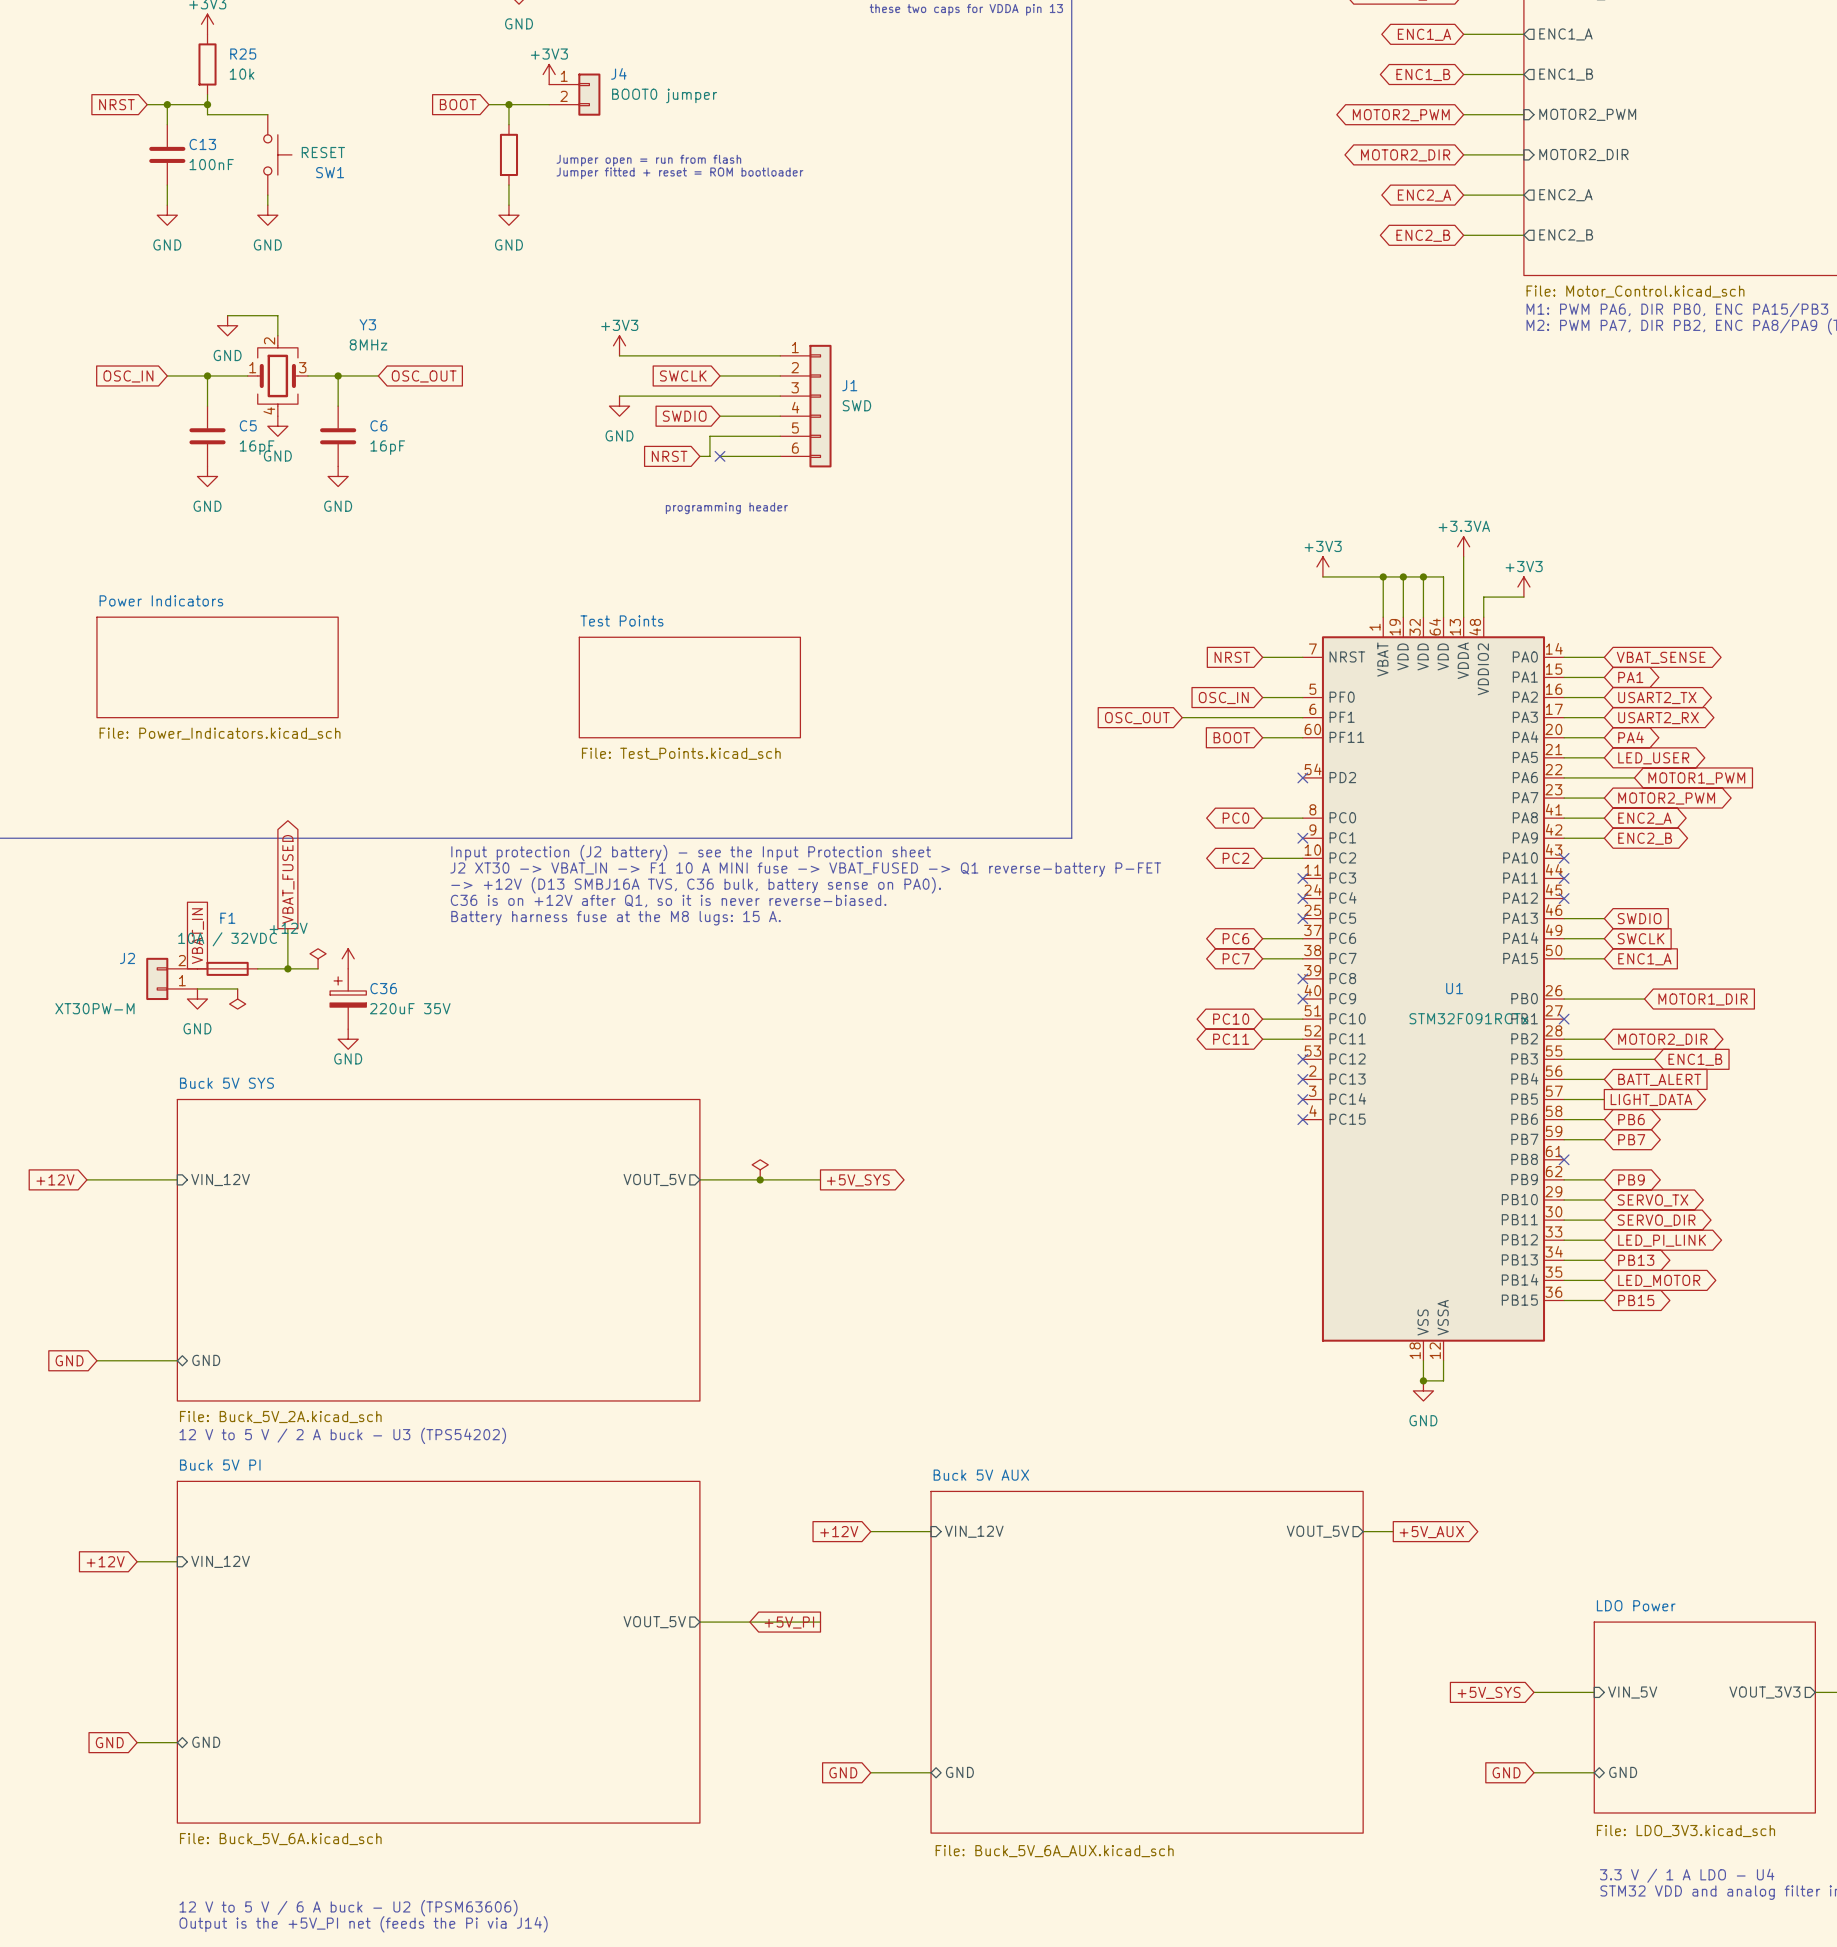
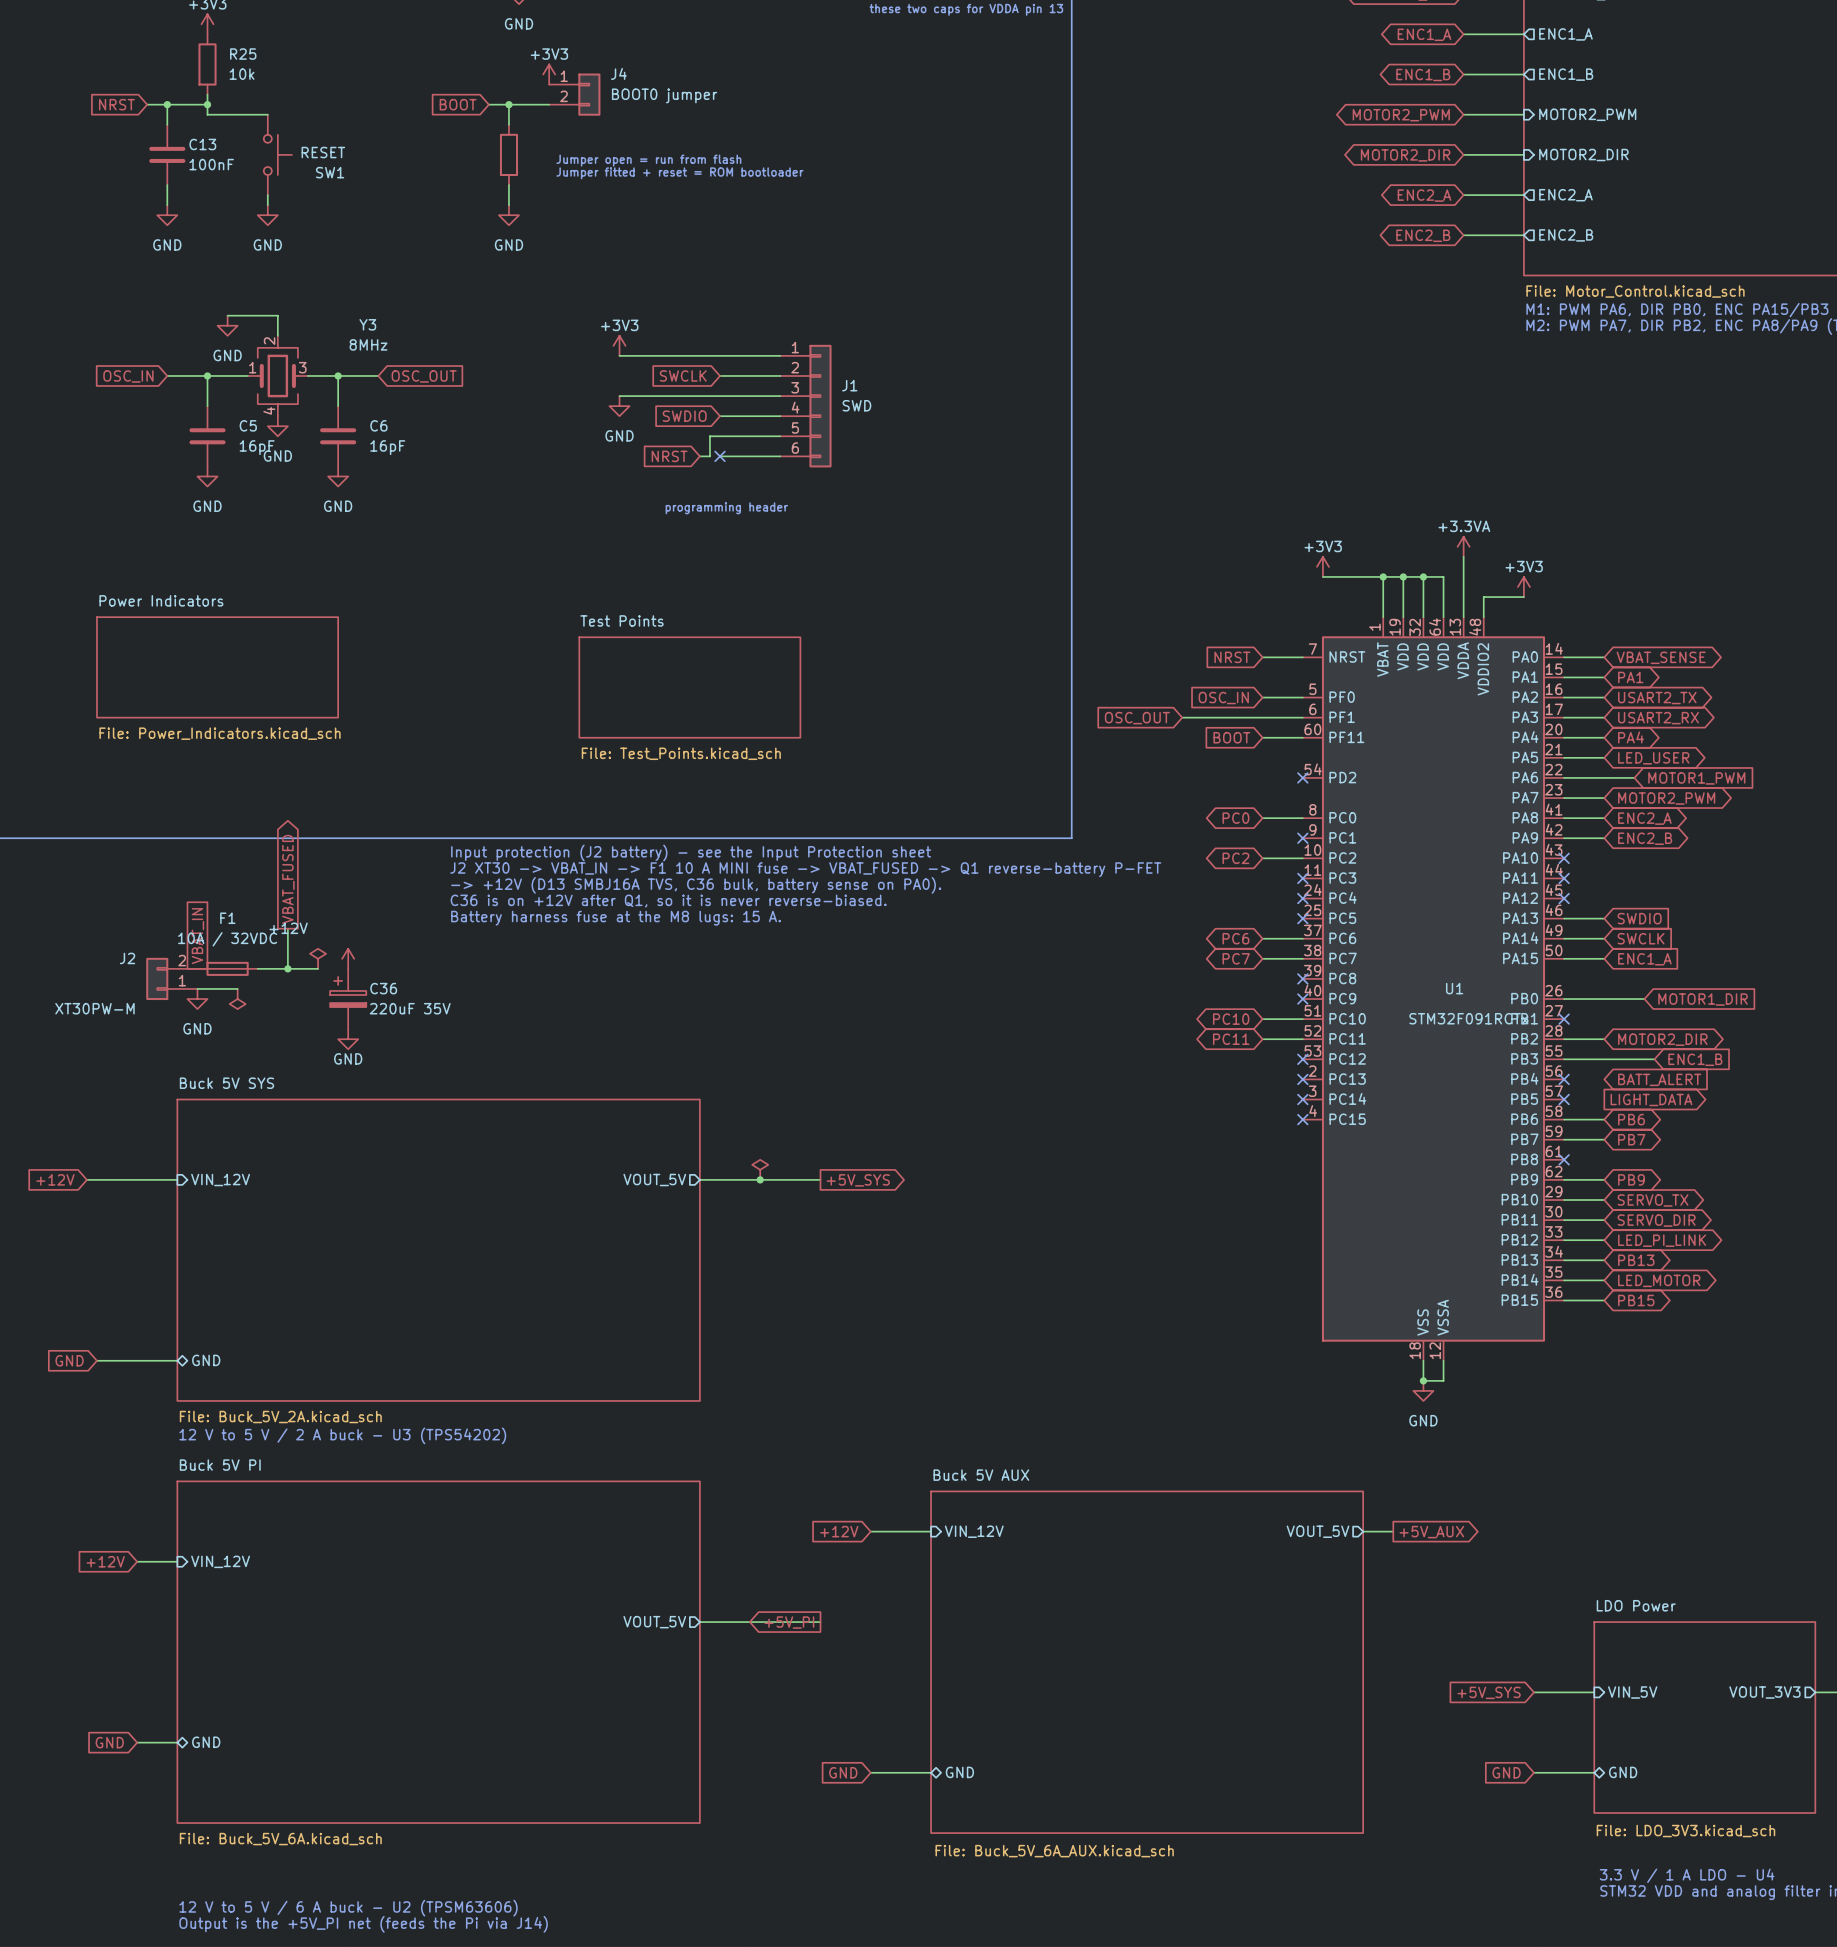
wire: (1564, 1079) (1604, 1079) -> none
no-connect mark: none -> (1564, 1079)
wire: (1564, 1099) (1604, 1099) -> none
no-connect mark: none -> (1564, 1099)

